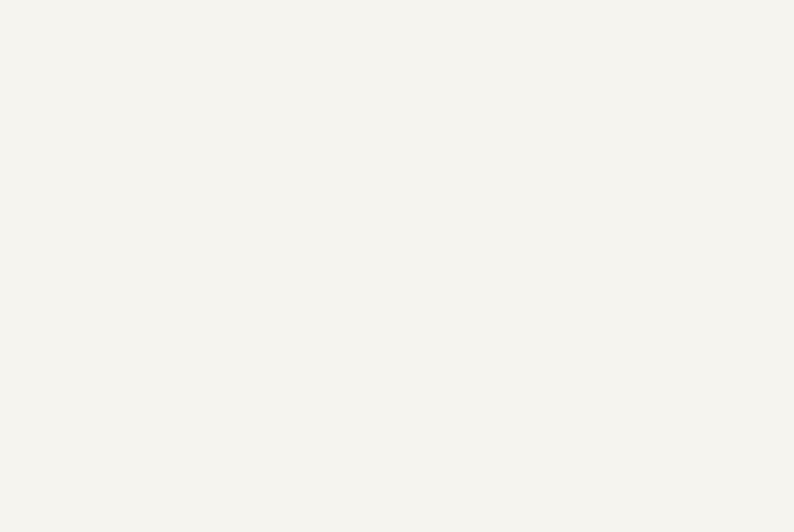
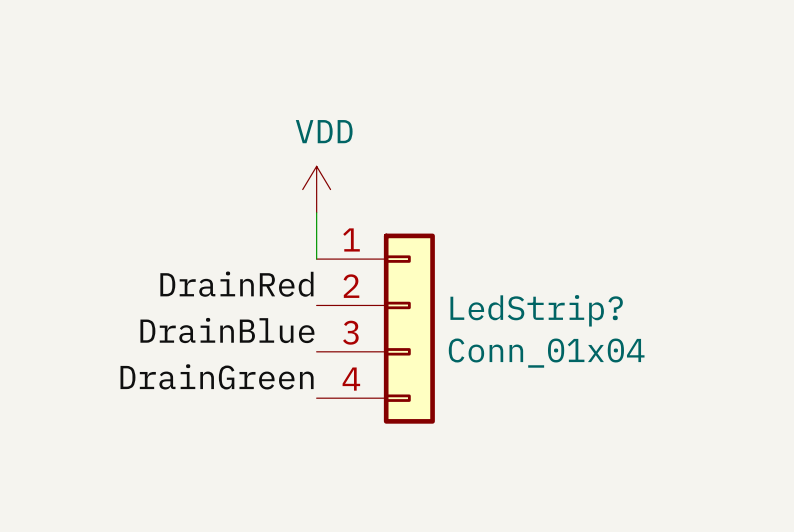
power symbol: none -> VDD (316, 189)
wire: none -> (316, 212) (316, 259)
label: none -> DrainRed (236, 284)
LedStrip?: none -> Conn_01x04 (375, 328)
label: none -> DrainBlue (227, 330)
label: none -> DrainGreen (217, 376)

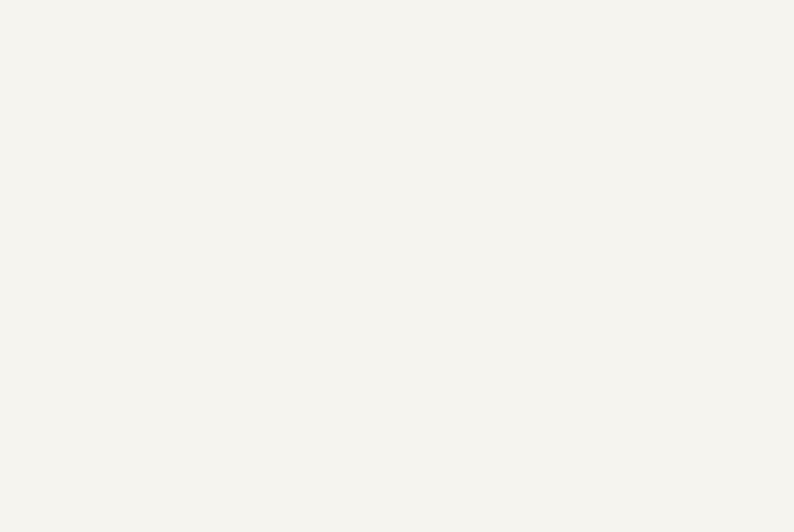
power symbol: VDD (316, 189) -> none
wire: (316, 212) (316, 259) -> none
label: DrainRed (236, 284) -> none
LedStrip?: Conn_01x04 (375, 328) -> none
label: DrainBlue (227, 330) -> none
label: DrainGreen (217, 376) -> none

